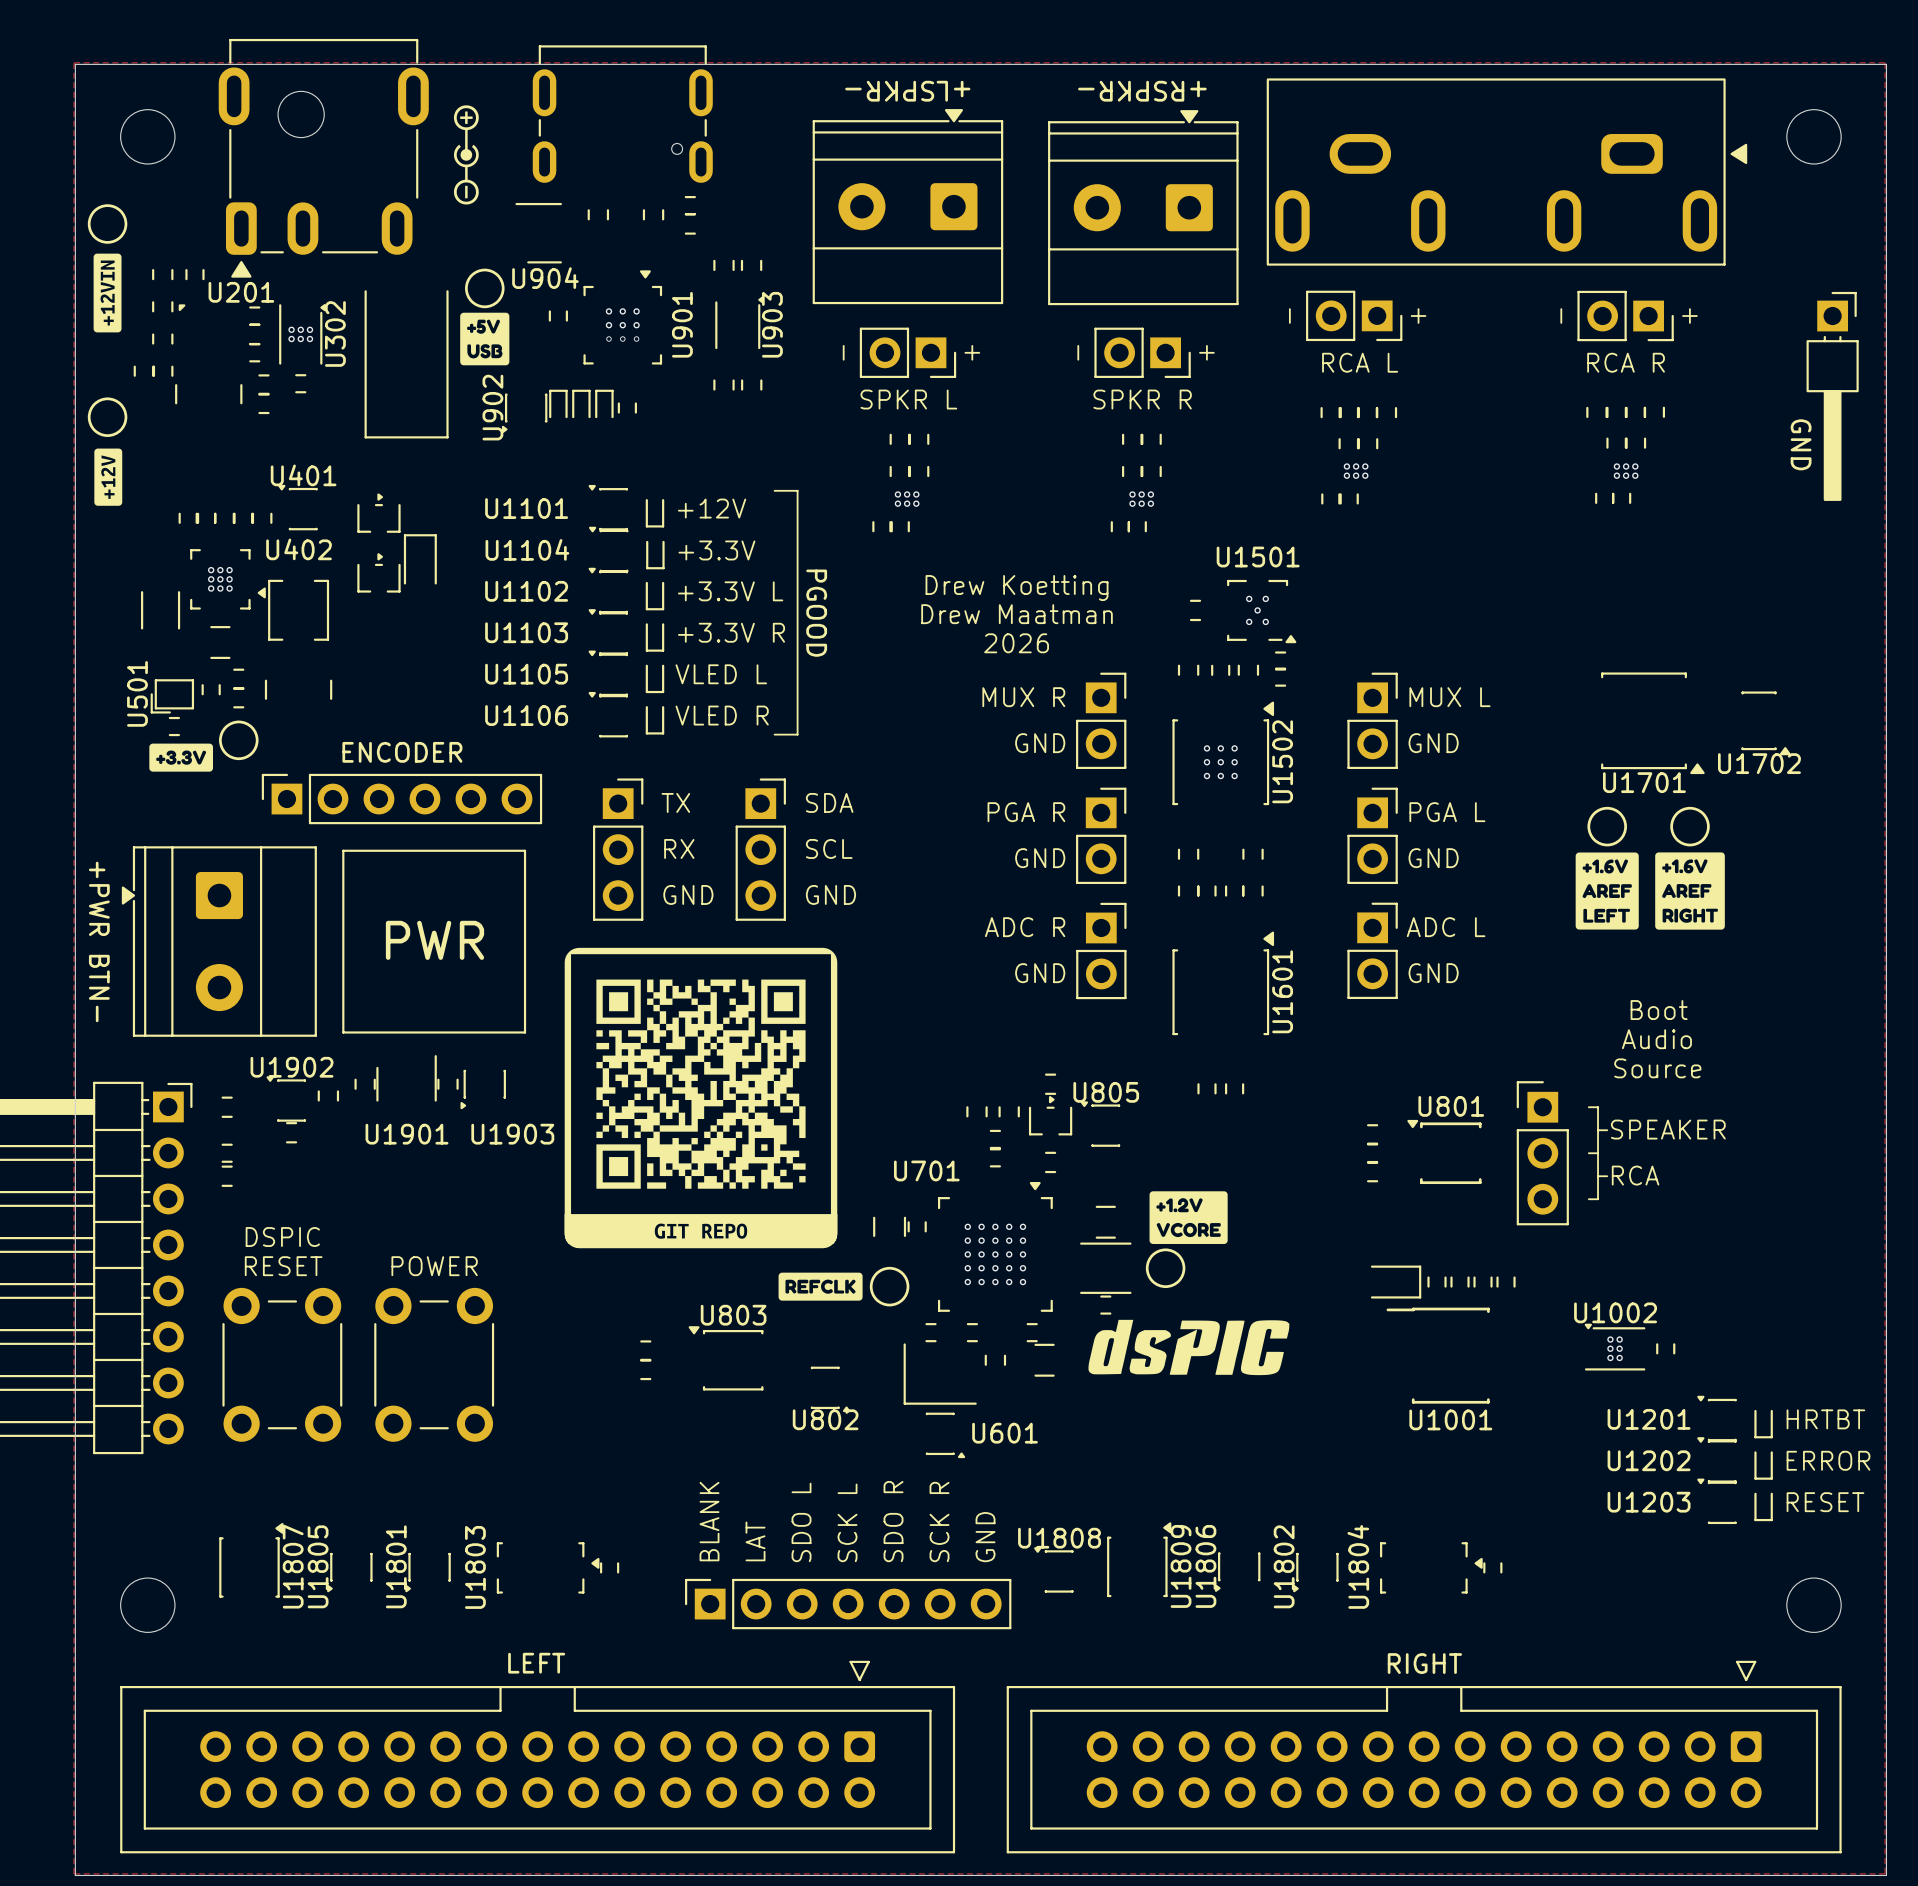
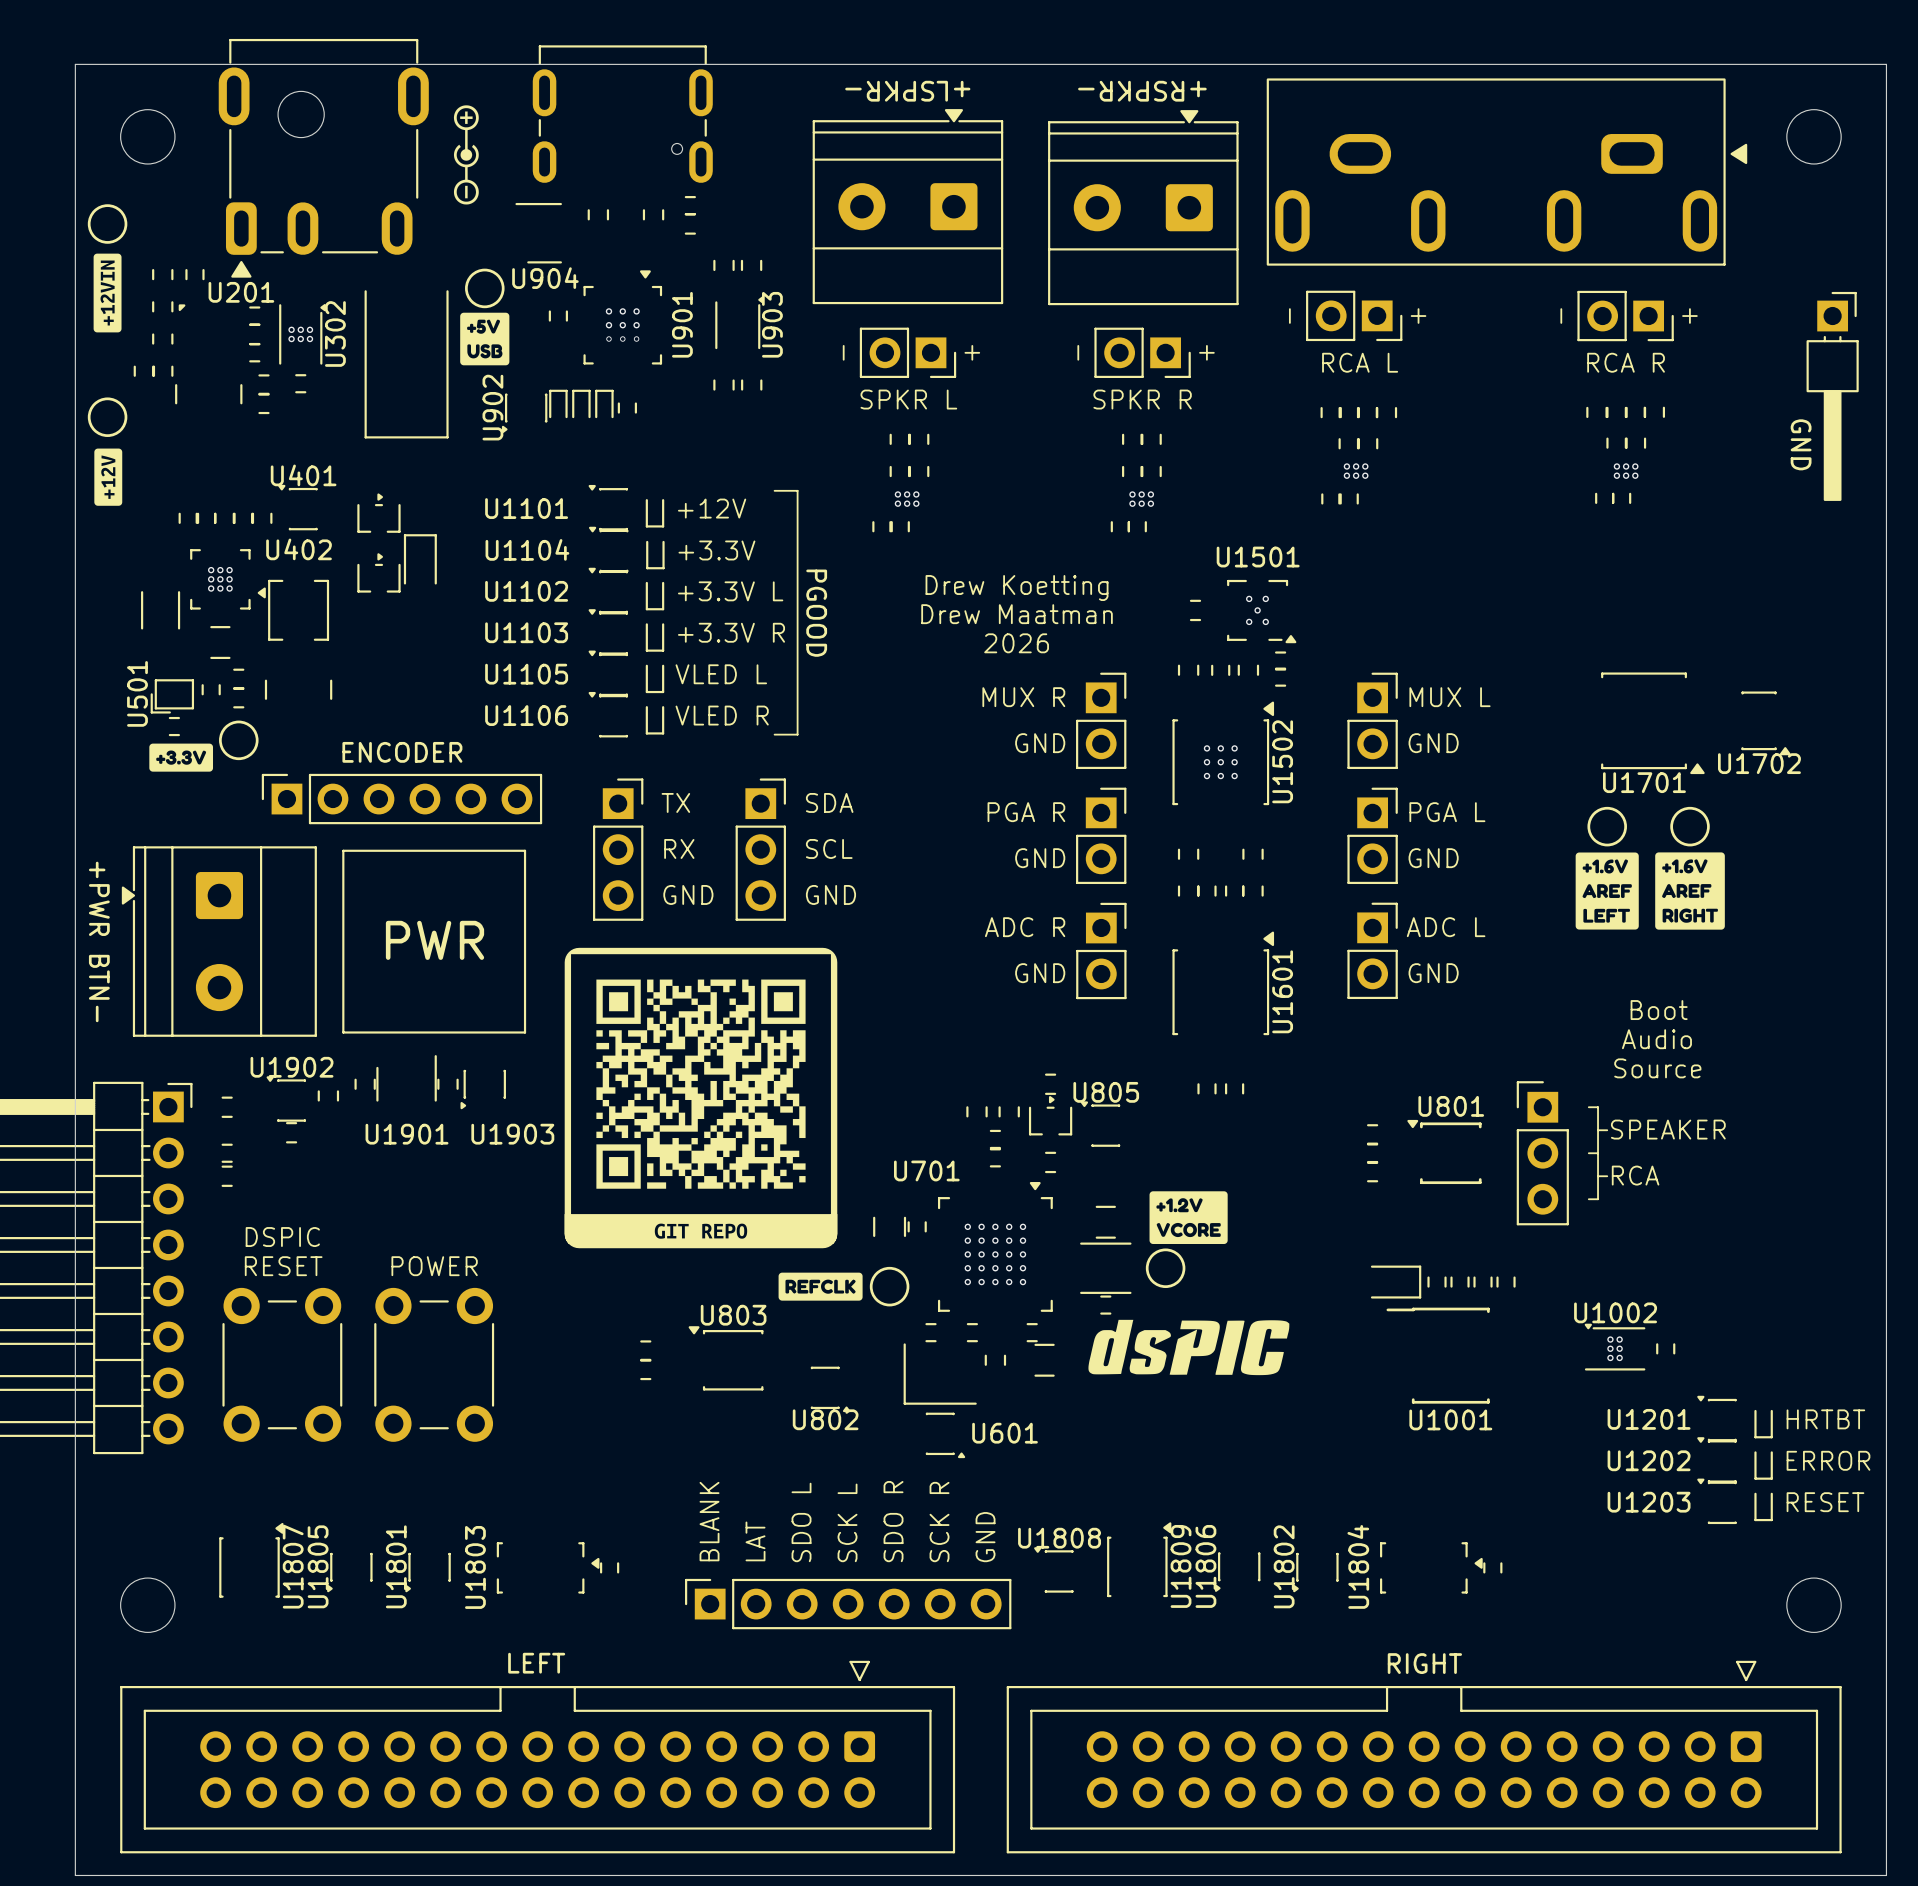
zone outline: (73, 62) (1885, 62) (1885, 1873) (73, 1873) (73, 62) -> none

